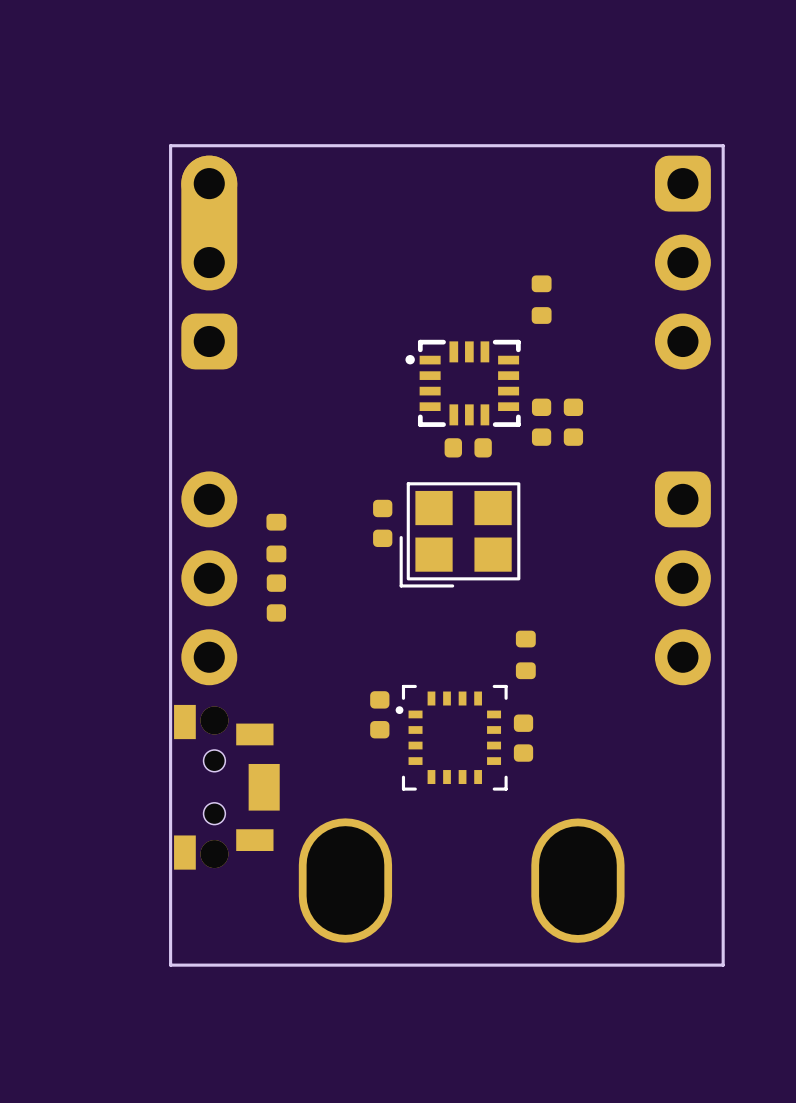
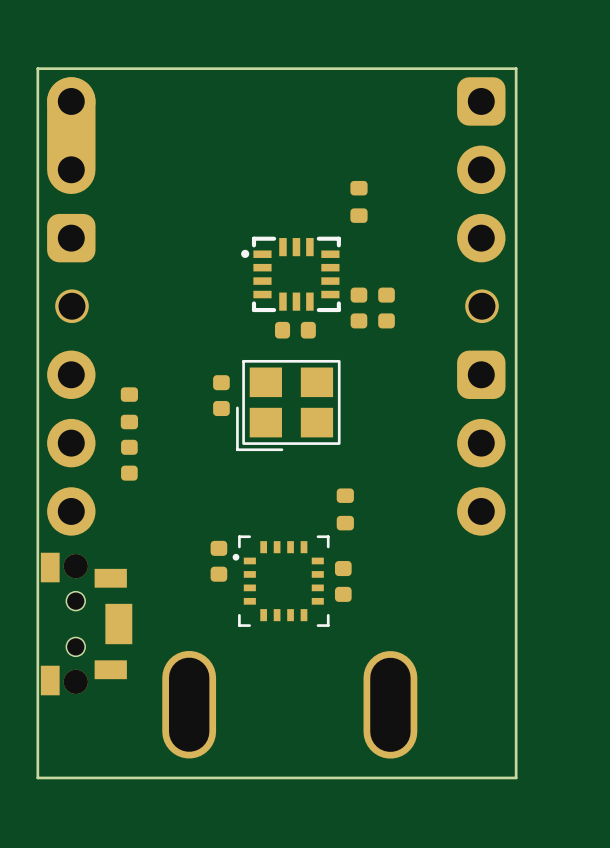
part: none -> (71, 306)
part: none -> (481, 306)
part footprint: [298, 818, 393, 943] -> [162, 650, 217, 759]
part footprint: [531, 818, 625, 943] -> [363, 651, 418, 759]

